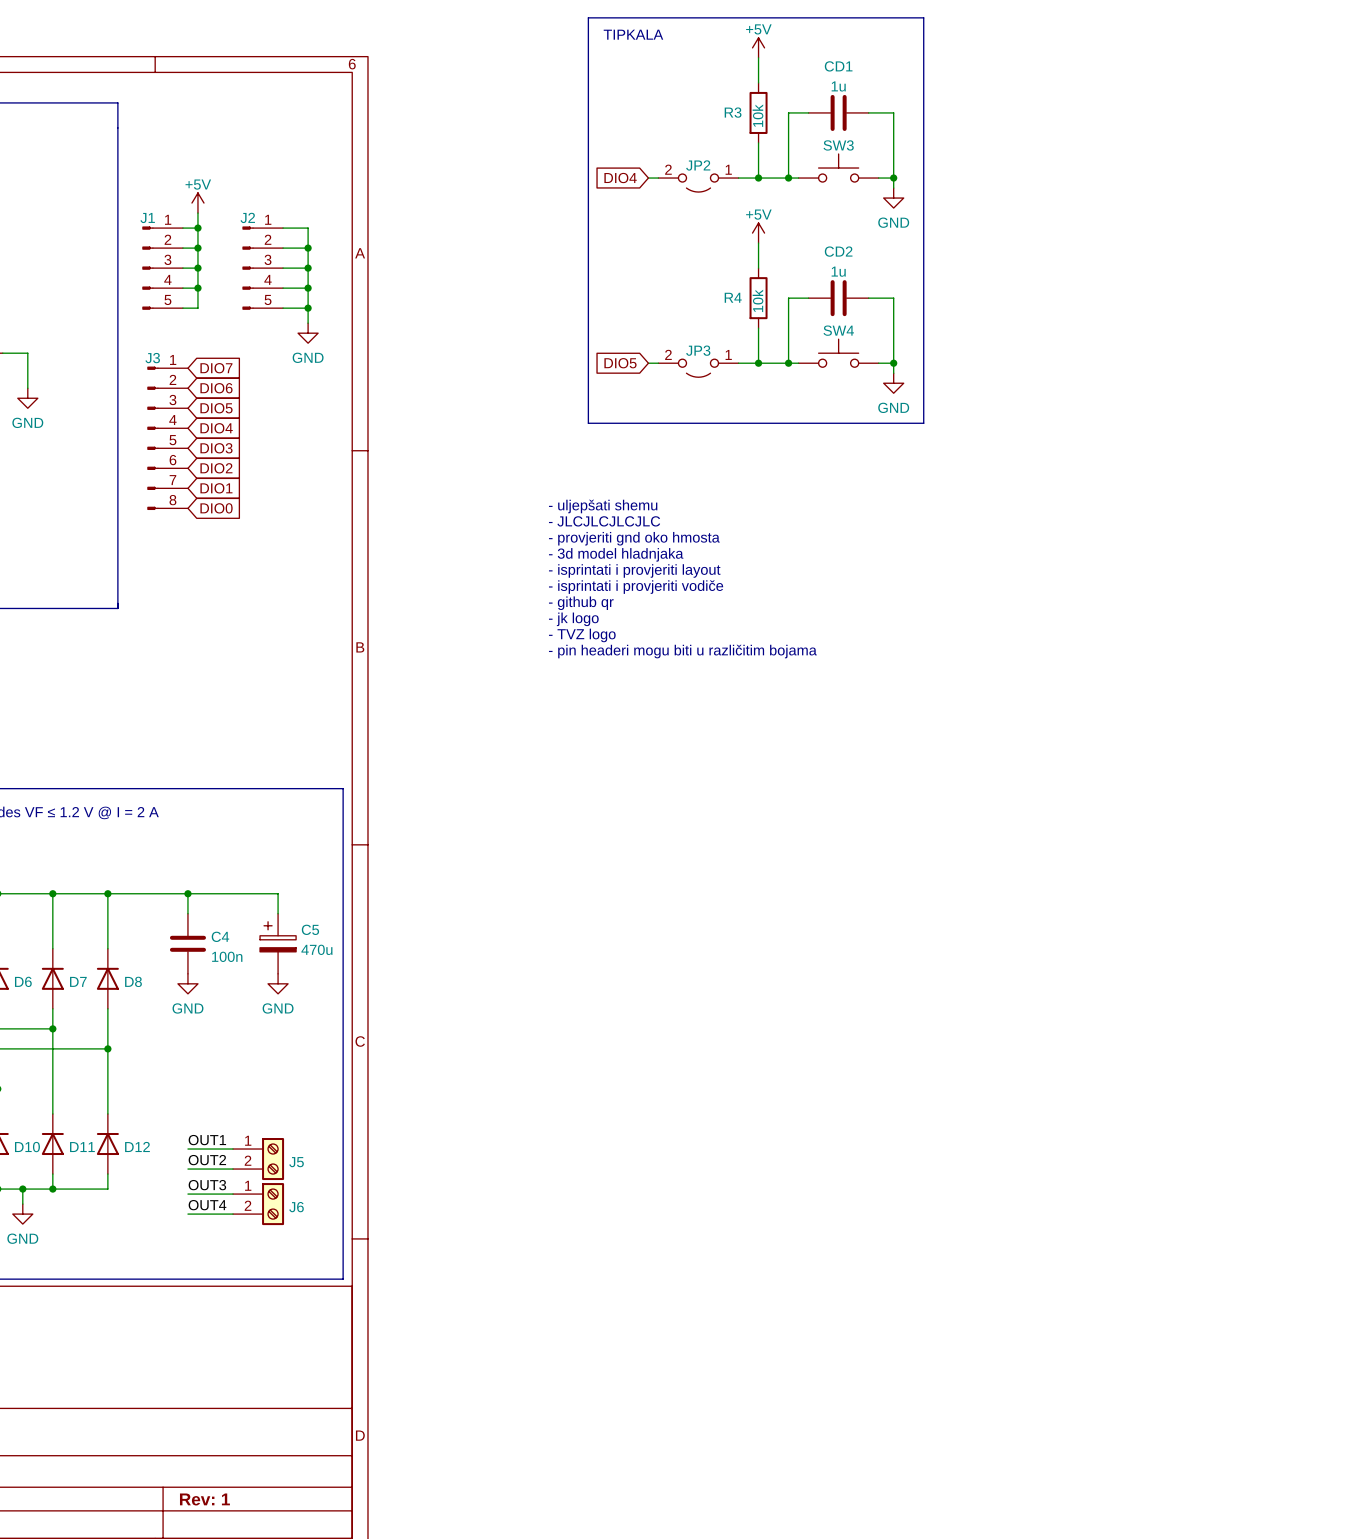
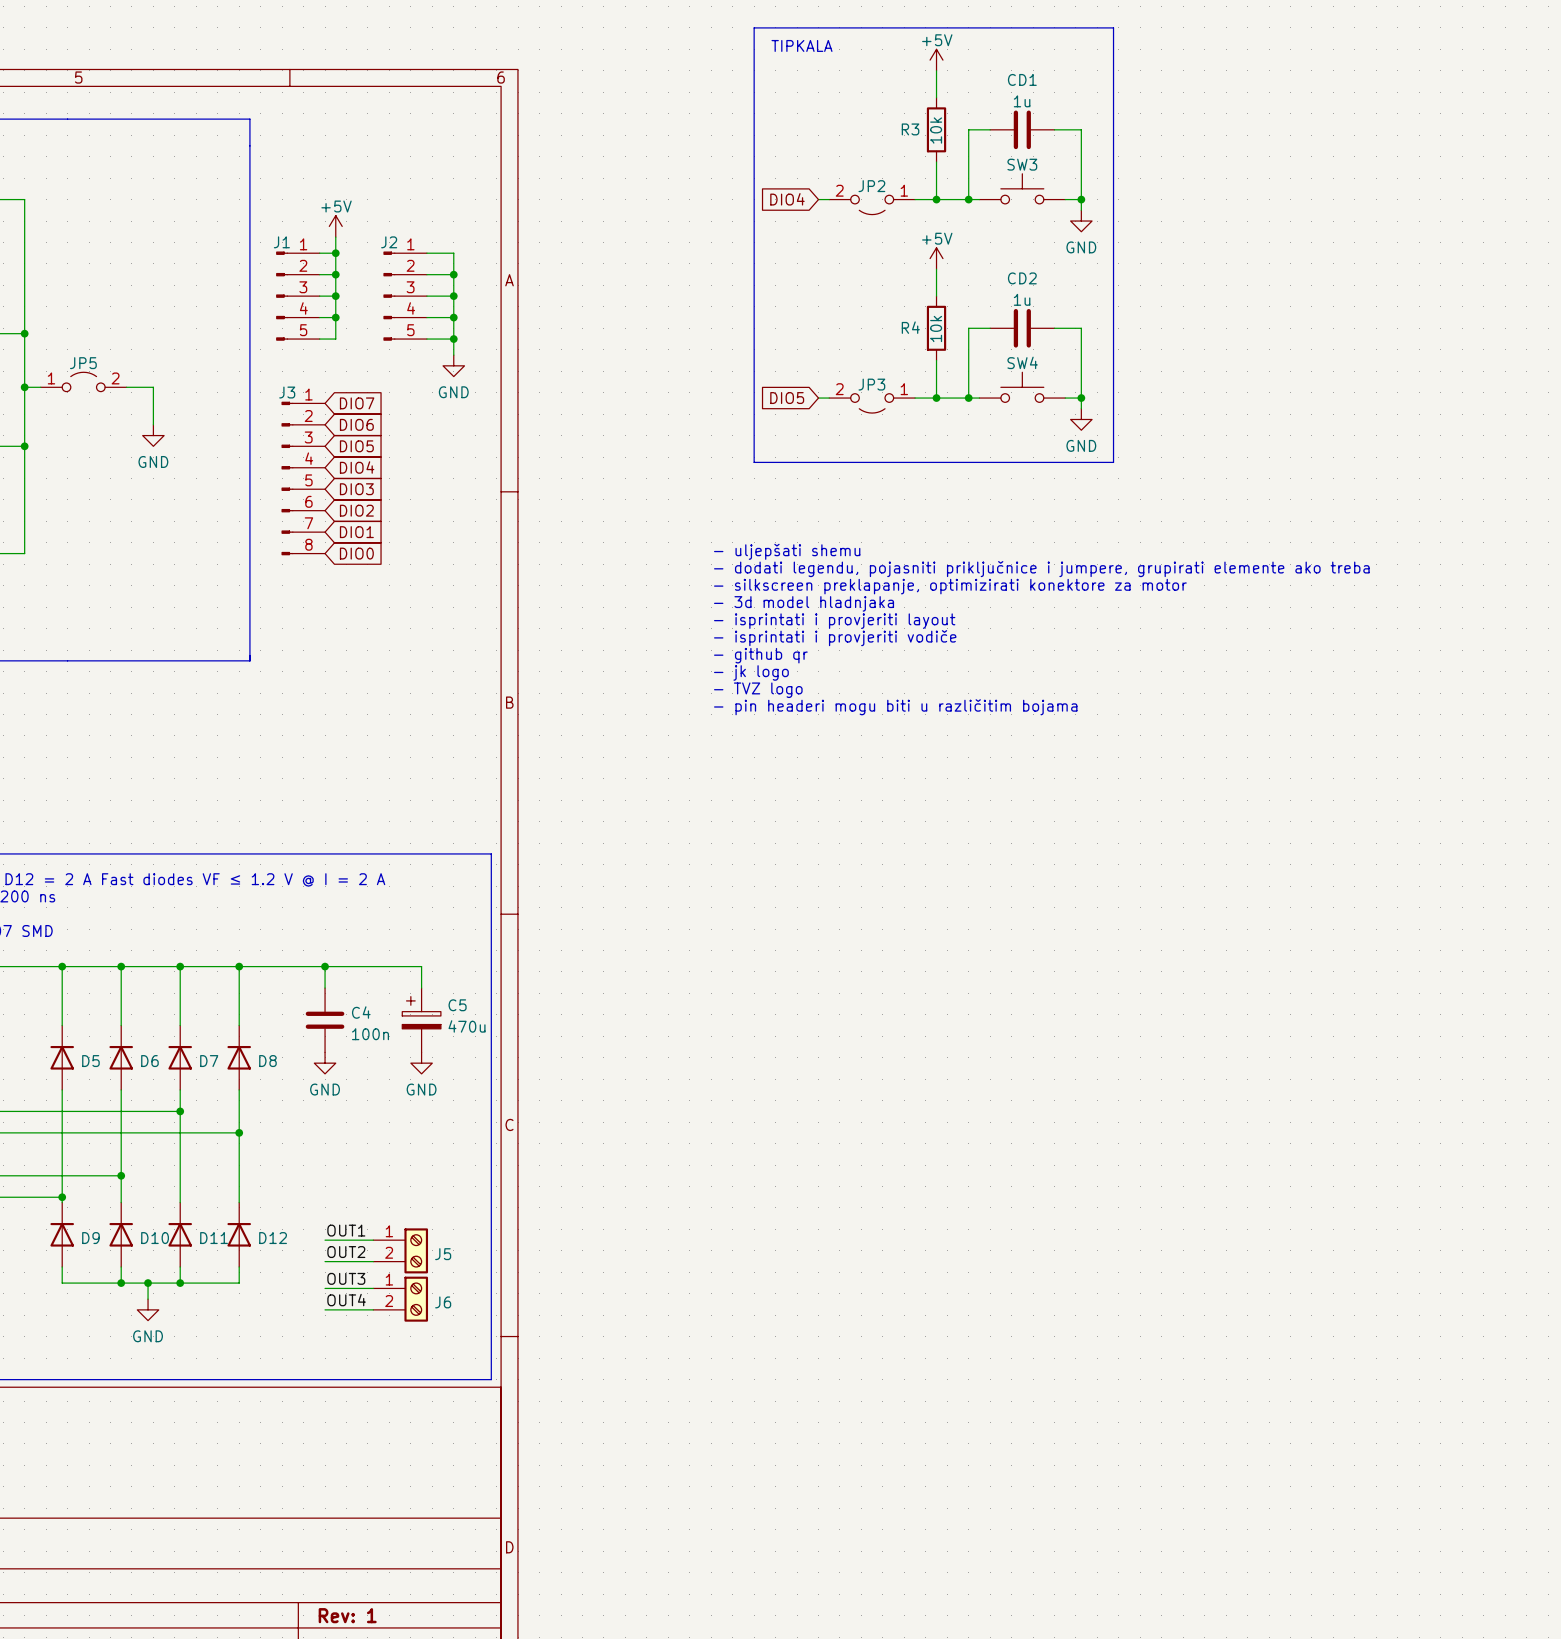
text: - JLCJLCJLCJLC (604, 521) -> - dodati legendu, pojasniti priključnice i jumpere, grupirati elemente ako treba (1041, 569)
text: - provjeriti gnd oko hmosta (634, 538) -> - silkscreen preklapanje, optimizirati konektore za motor (950, 586)

